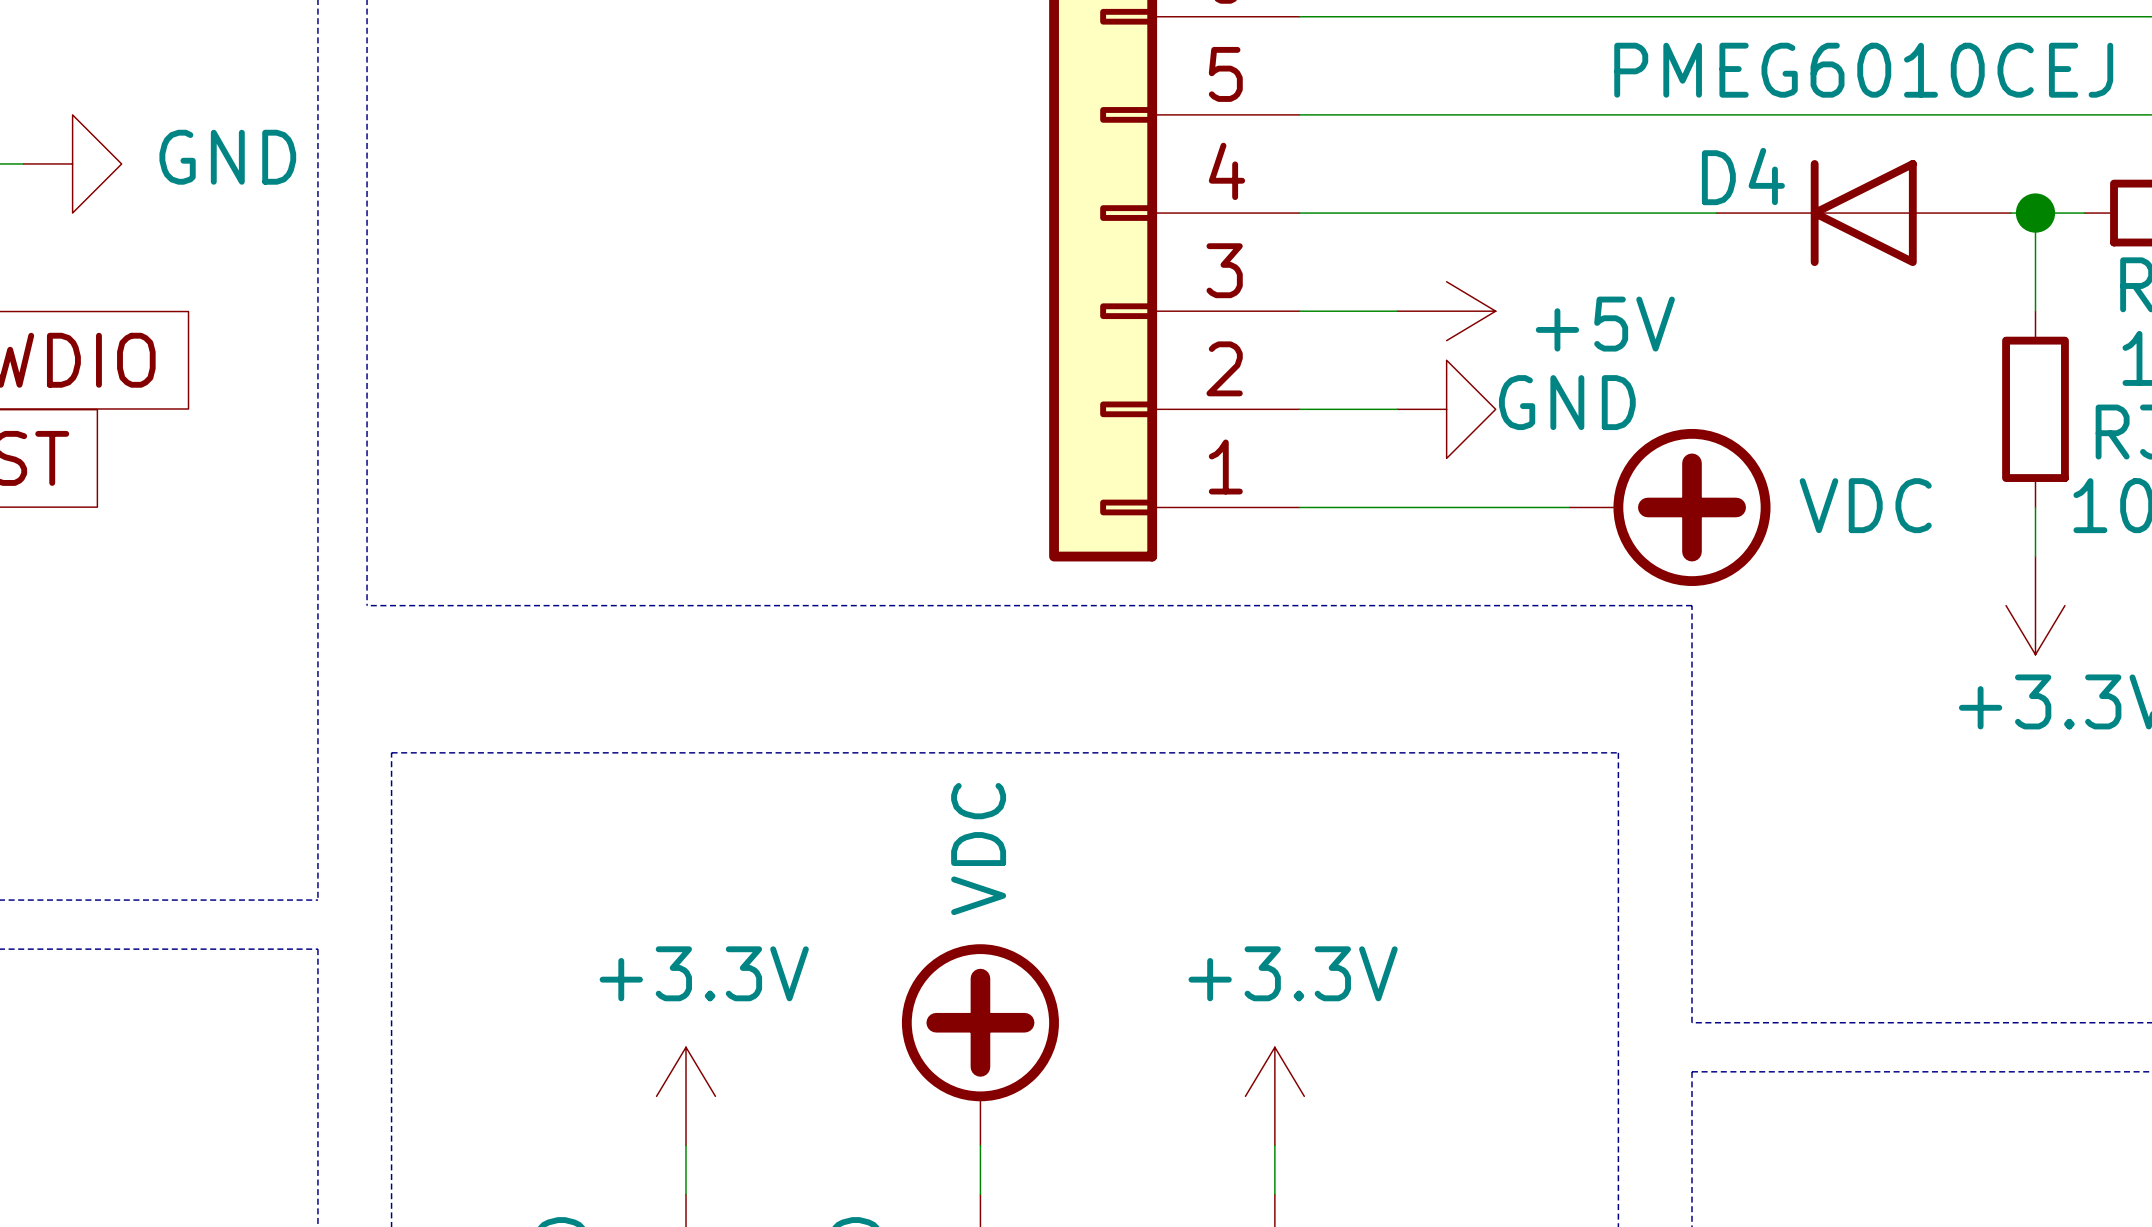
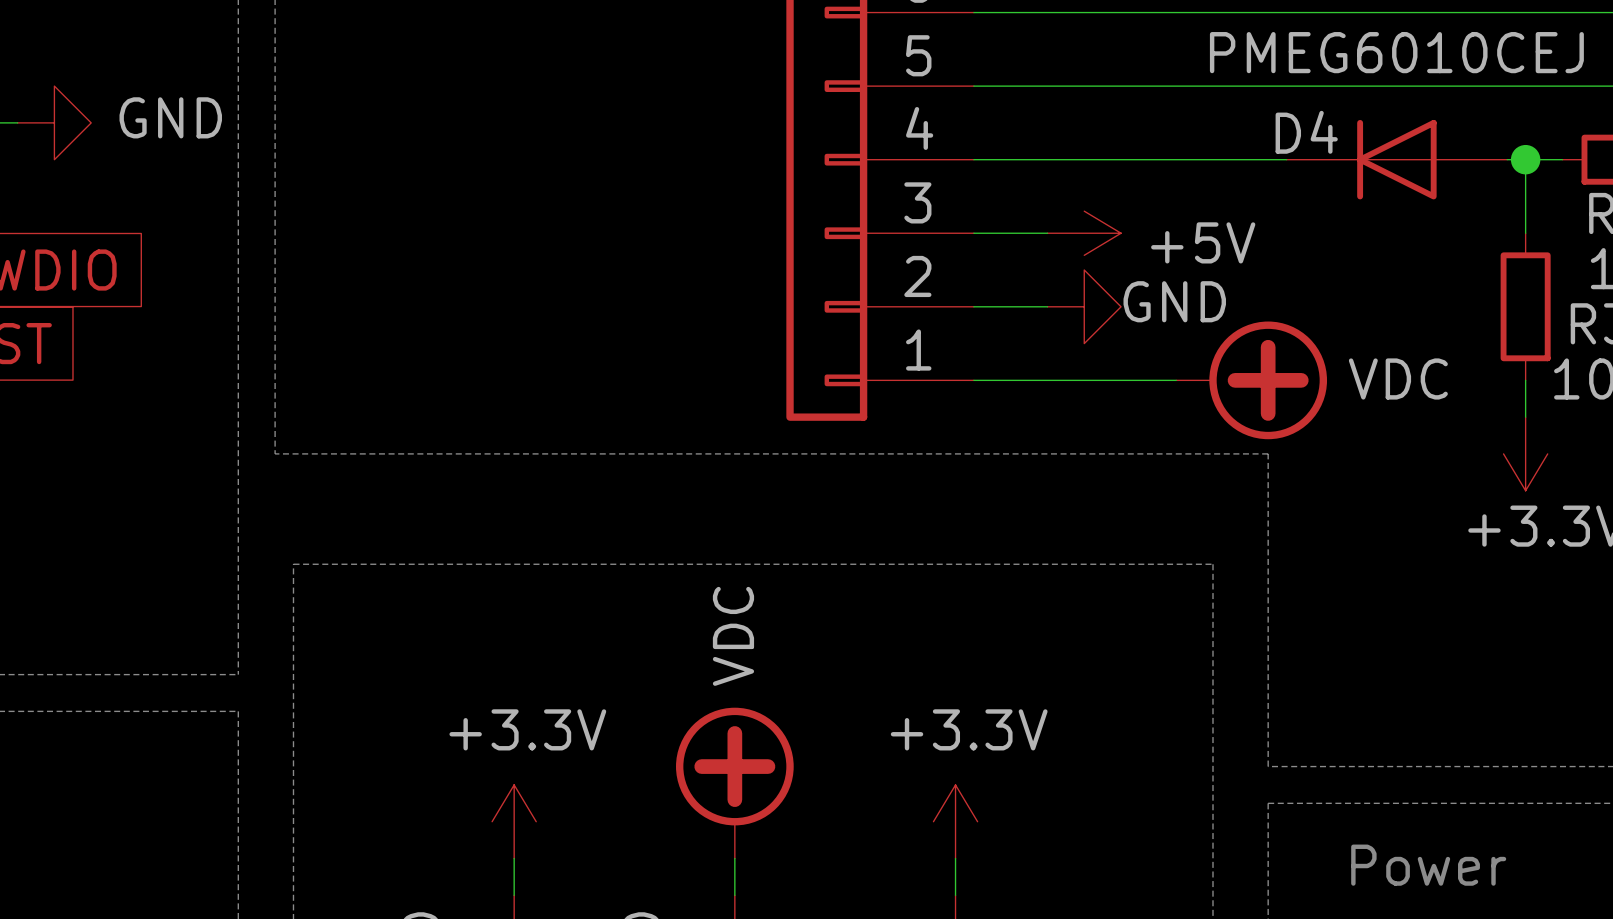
text: none -> Power (1428, 865)

